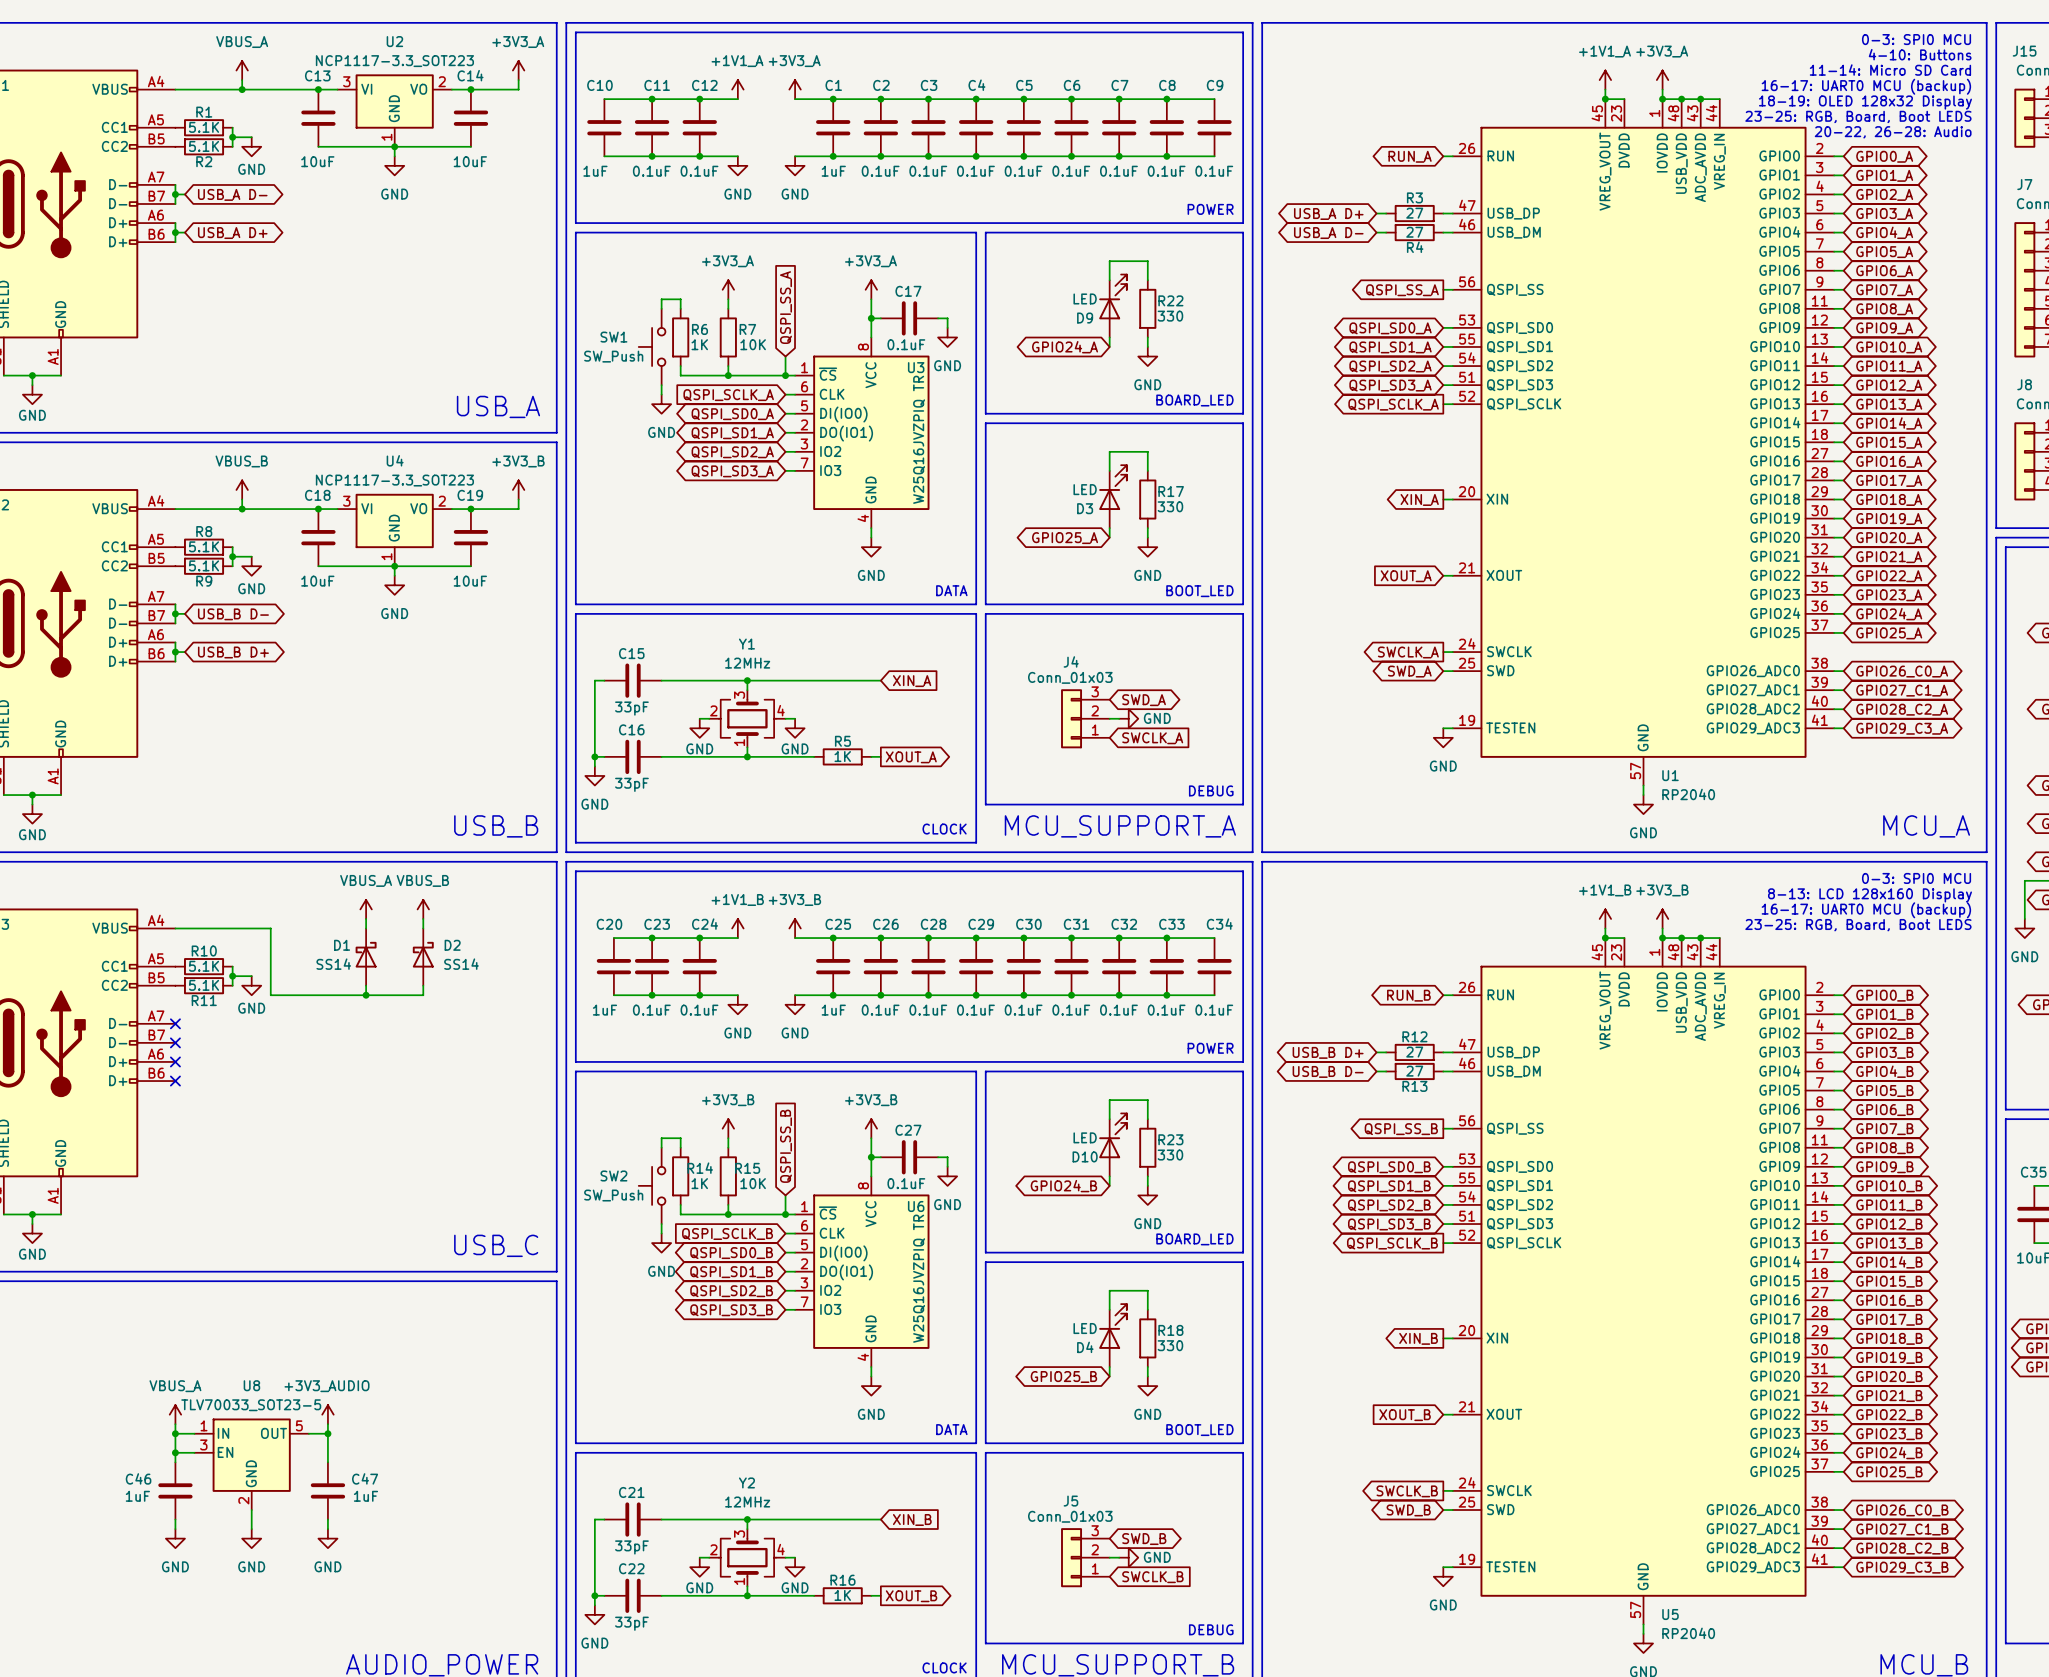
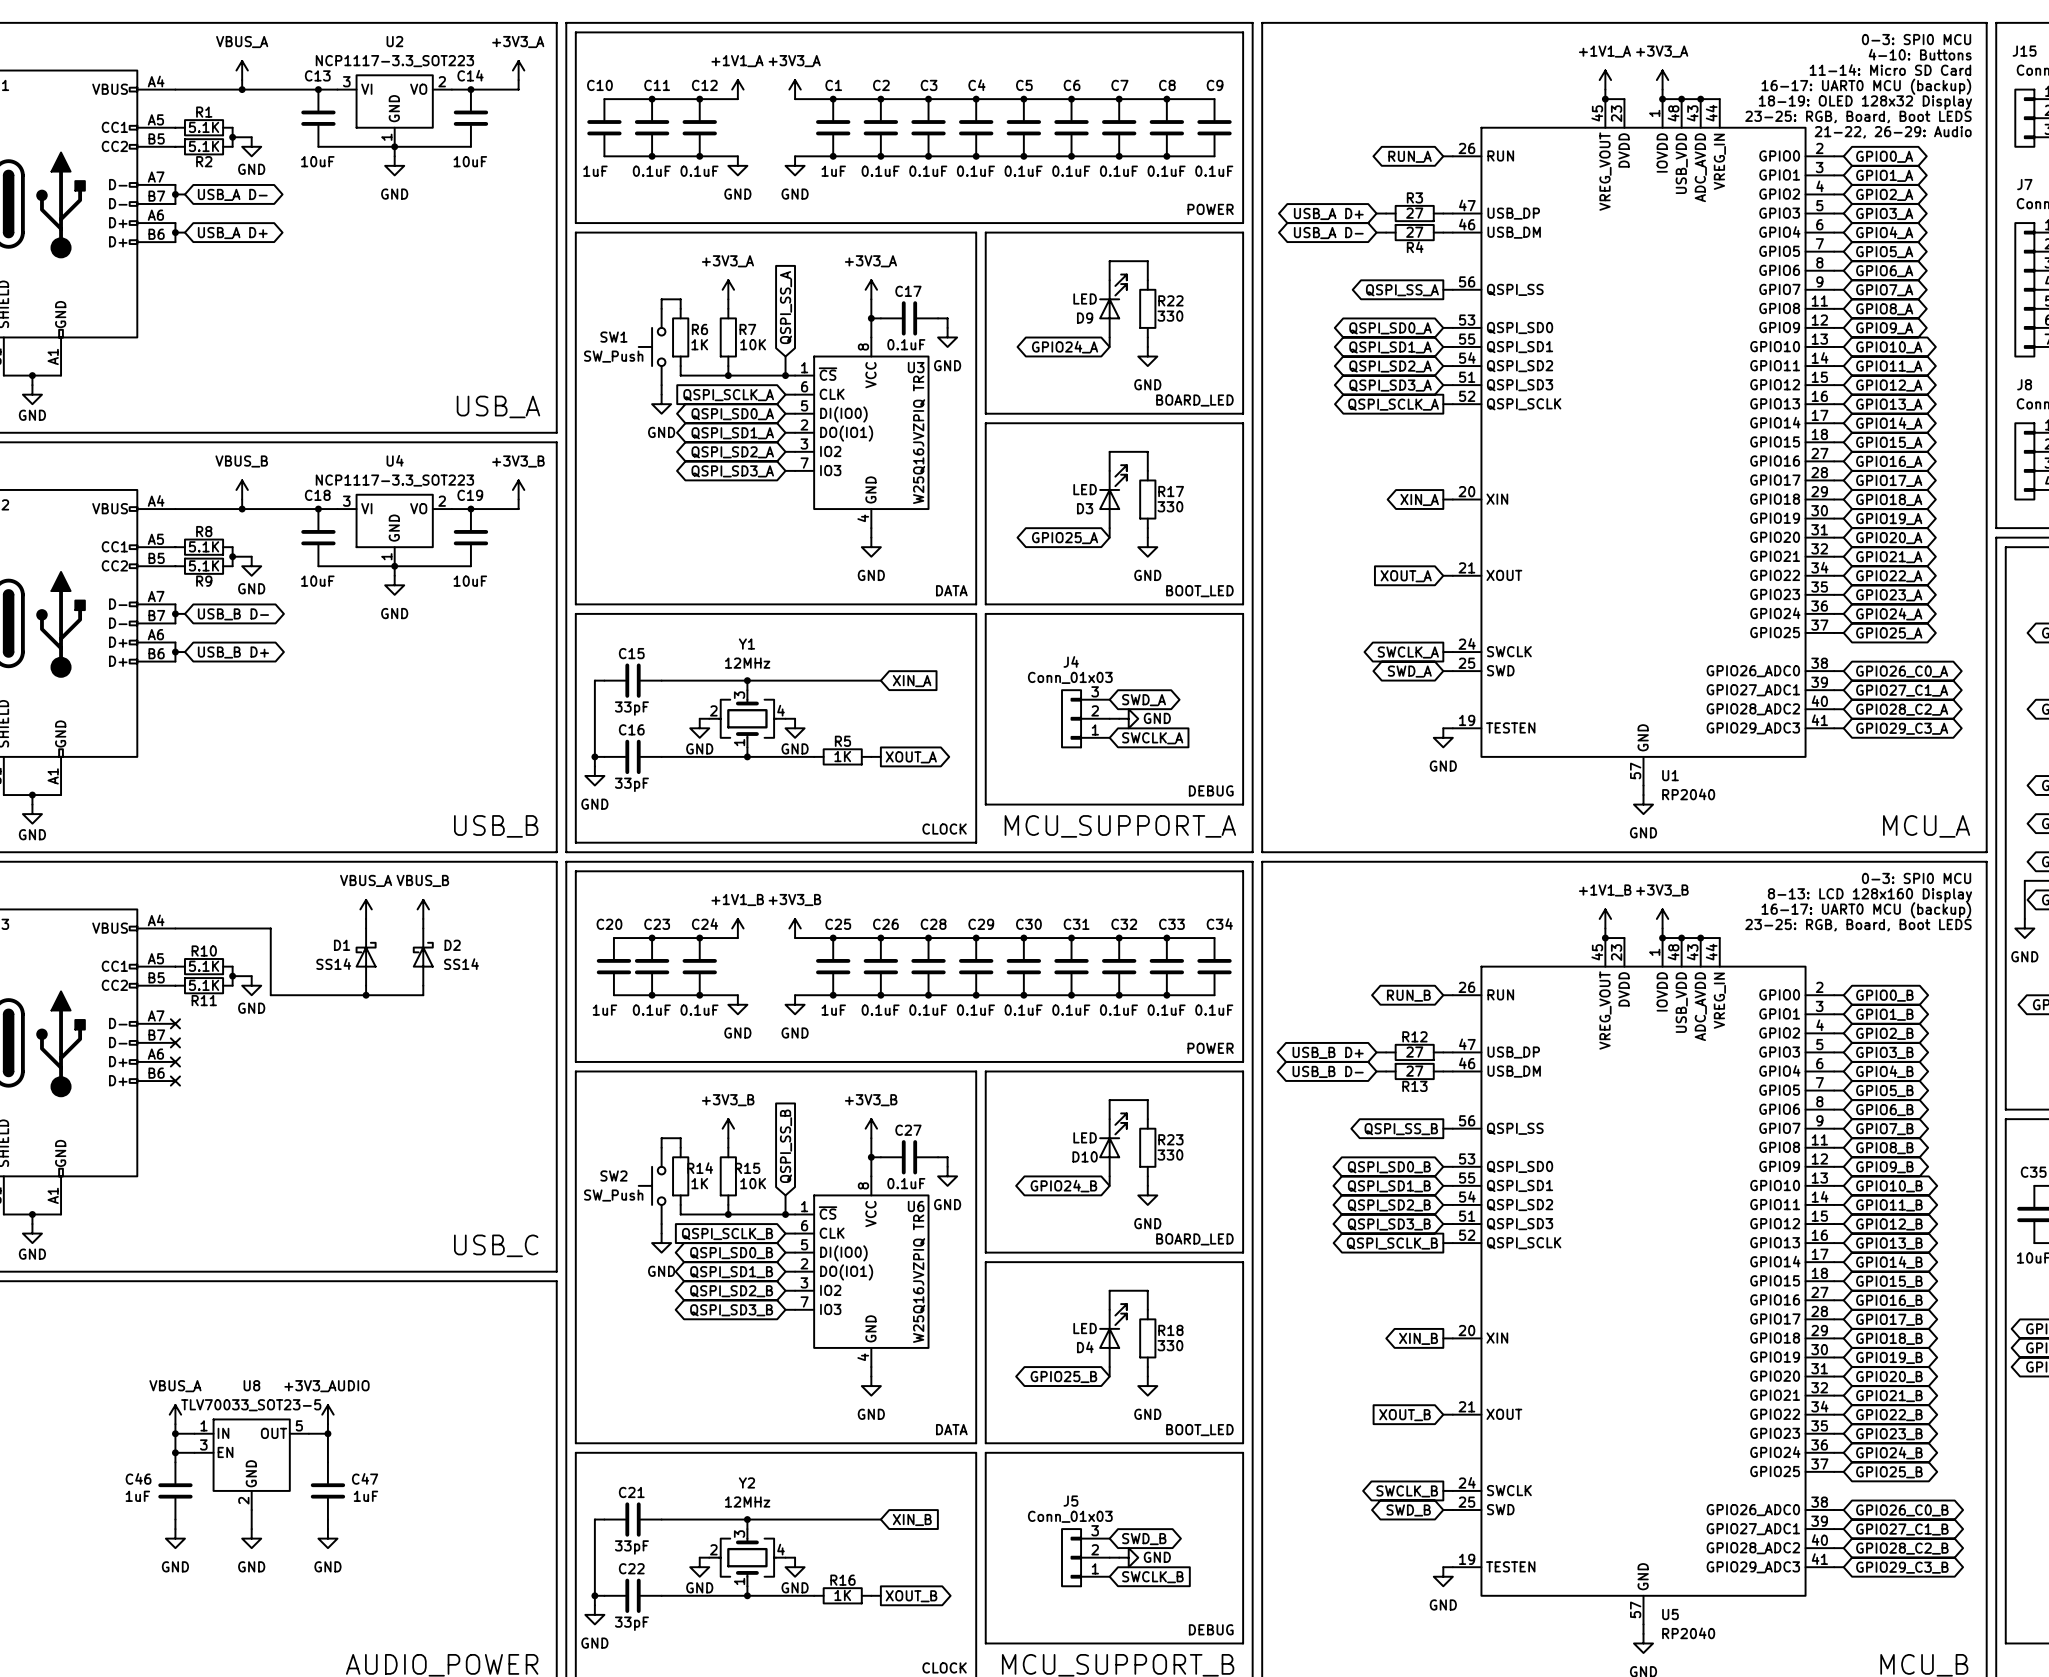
text: 20-22, 26-28: Audio (1893, 132) -> 21-22, 26-29: Audio (1893, 132)

